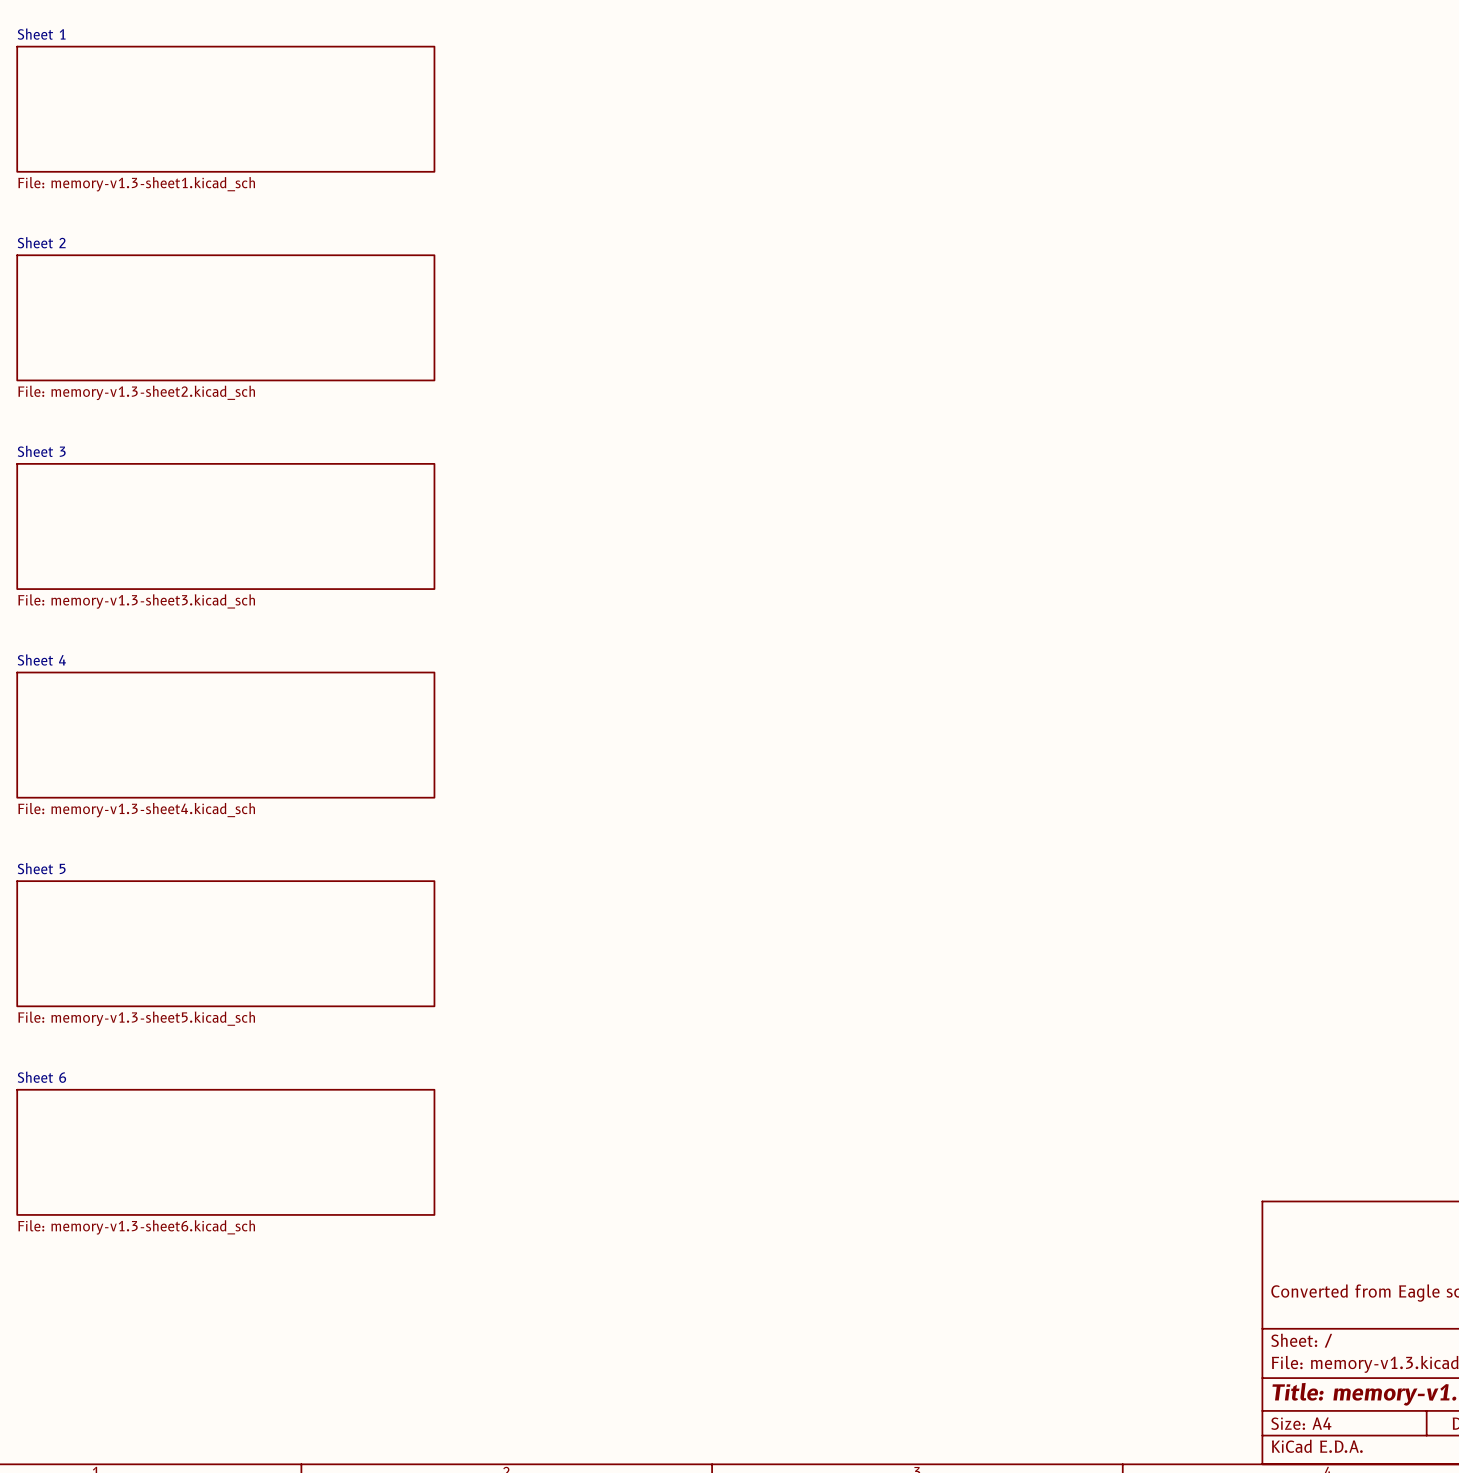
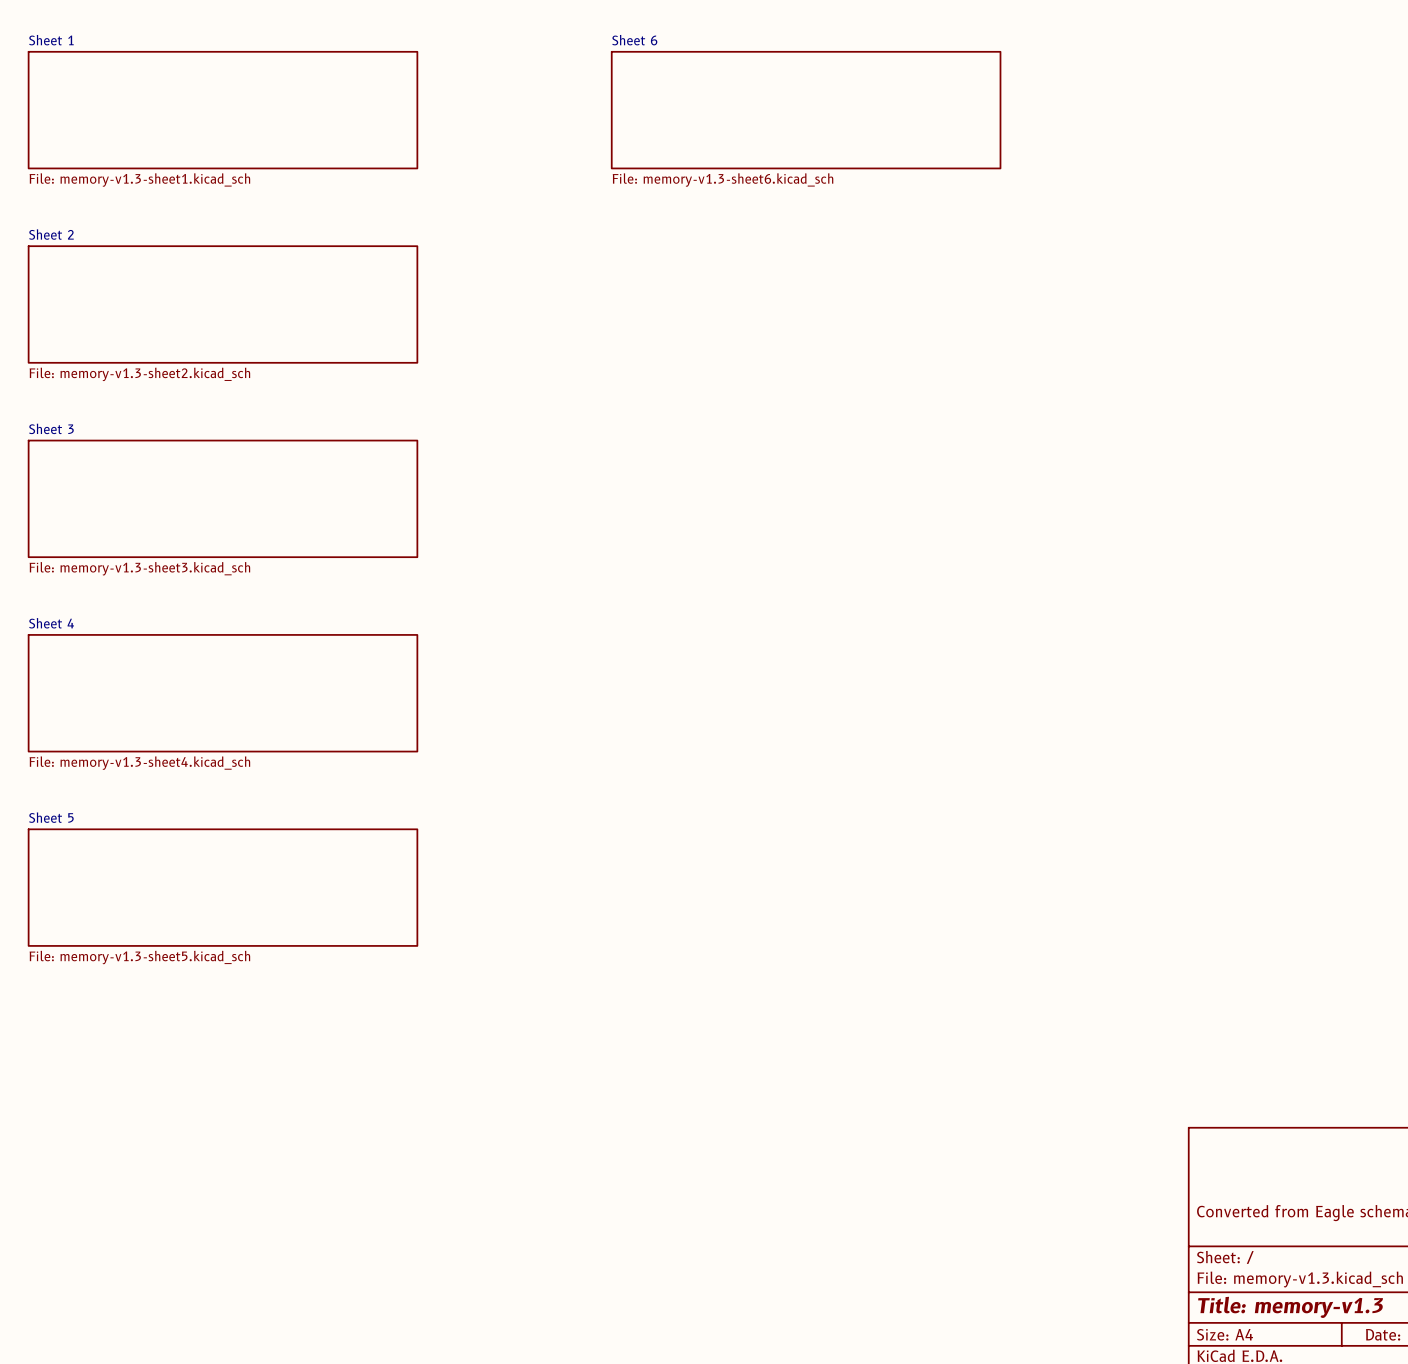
sheet Sheet 6 position: (225, 1152) -> (806, 110)

